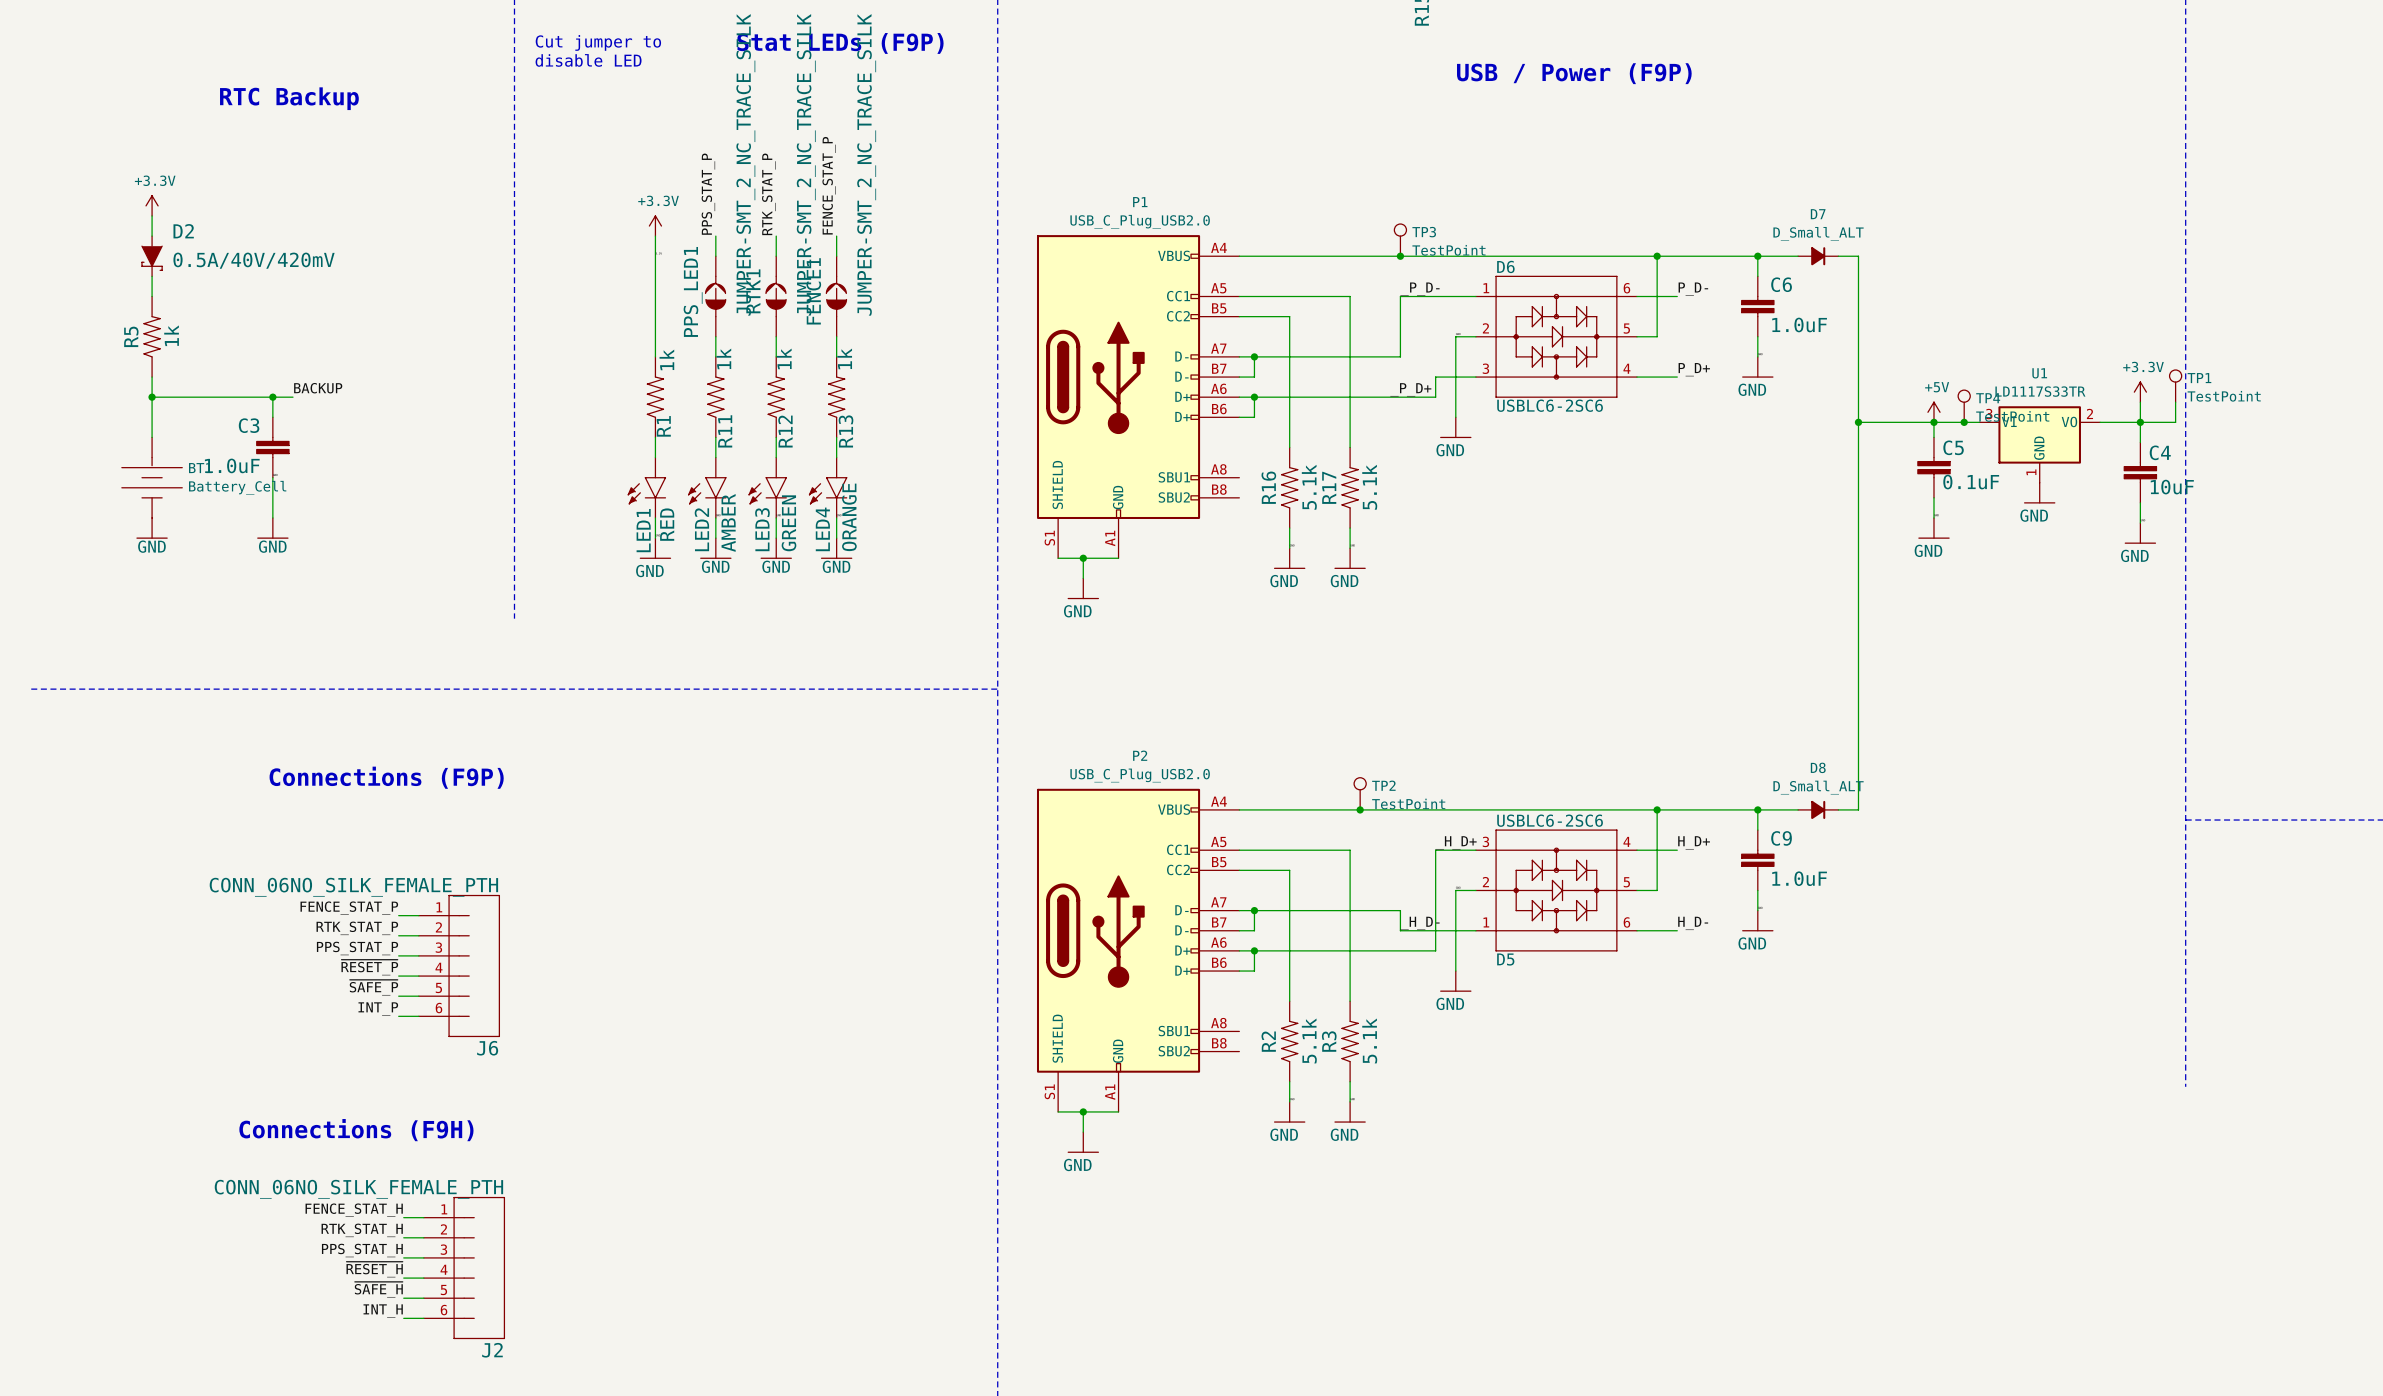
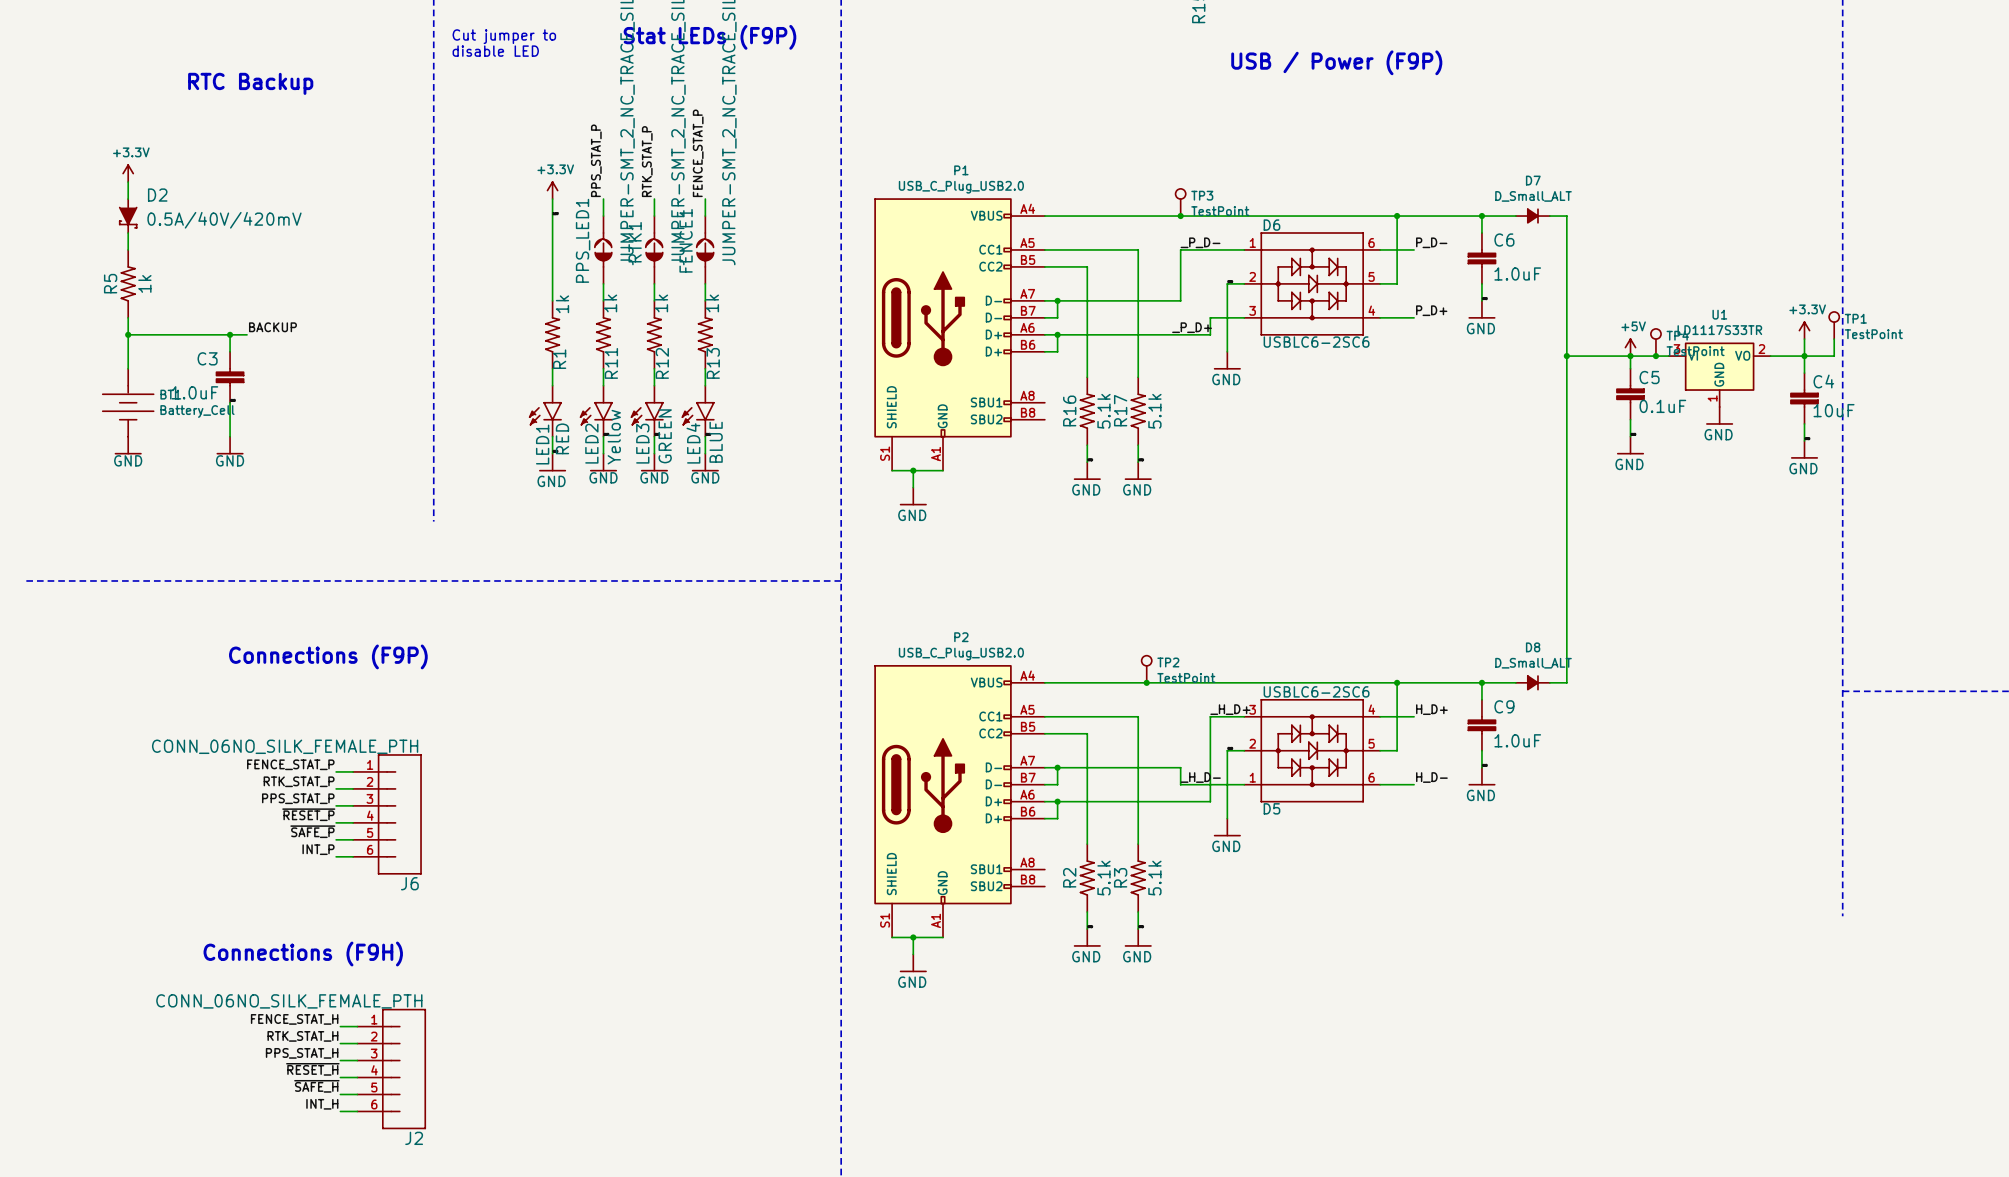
LED4 value: ORANGE (849, 517) -> BLUE (716, 442)
LED2 value: AMBER (728, 522) -> Yellow (614, 437)

